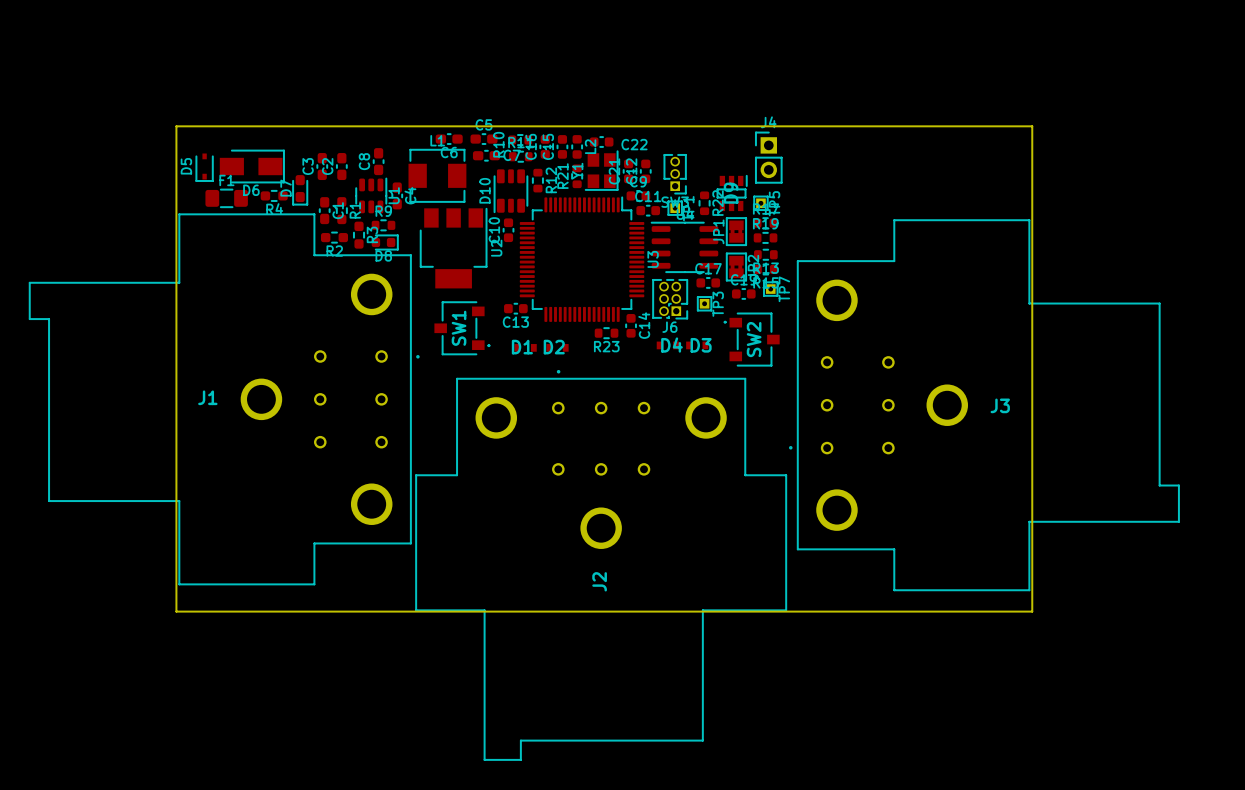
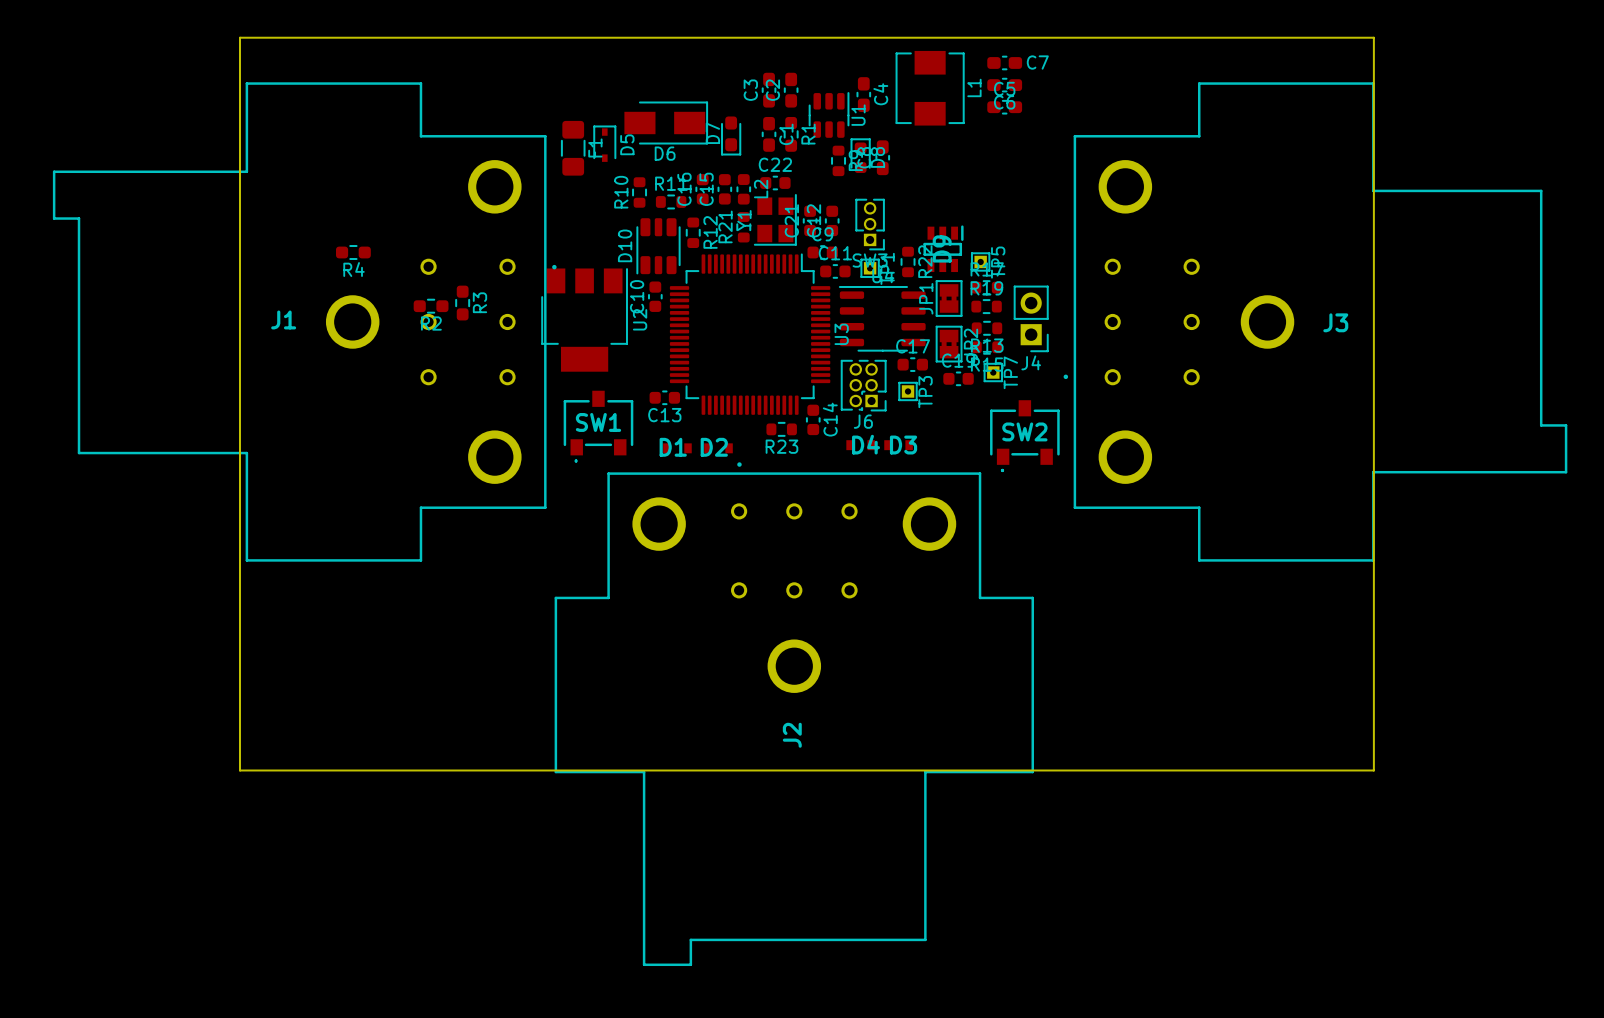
board edge: (176, 126) (1032, 126) (1032, 611) (176, 611) (176, 126) -> (239, 37) (239, 770) (1373, 770) (1373, 37) (239, 37)
C6 position: (449, 139) -> (1004, 85)
C5 position: (484, 139) -> (1004, 107)
R10 rotation: 0° (520, 140) -> 90° clockwise (639, 192)
R10 position: (520, 140) -> (639, 192)
C22 name position: C22 (634, 144) -> C22 (775, 164)
C7 position: (486, 155) -> (1004, 62)
J4 rotation: 0° (768, 157) -> 180° (1031, 318)
J4 position: (768, 157) -> (1031, 318)
C8 position: (378, 161) -> (882, 157)
D6 position: (252, 166) -> (666, 123)
C3 position: (322, 166) -> (769, 90)
C2 position: (341, 166) -> (791, 90)
D5 rotation: 0° (204, 167) -> 180° (604, 143)
D5 position: (204, 167) -> (604, 143)
L1 rotation: 0° (437, 175) -> 90° clockwise (930, 88)
L1 position: (437, 175) -> (930, 88)
D7 position: (300, 190) -> (731, 135)
U1 position: (371, 195) -> (829, 115)
C4 position: (397, 195) -> (863, 94)
F1 rotation: 0° (226, 198) -> 90° clockwise (573, 148)
F1 position: (226, 198) -> (573, 148)
C1 position: (324, 210) -> (769, 134)
R1 position: (341, 210) -> (791, 134)
R9 rotation: 0° (383, 225) -> 90° clockwise (838, 160)
R9 position: (383, 225) -> (838, 160)
D8 rotation: 0° (385, 242) -> 90° counterclockwise (860, 155)
D8 position: (385, 242) -> (860, 155)
SW1 rotation: 0° (462, 328) -> 90° clockwise (598, 426)
SW2 rotation: 0° (751, 339) -> 90° counterclockwise (1024, 435)
SW2 position: (751, 339) -> (1024, 435)
J1 position: (224, 399) -> (304, 321)
J3 position: (984, 405) -> (1315, 321)
J2 position: (601, 565) -> (794, 714)

